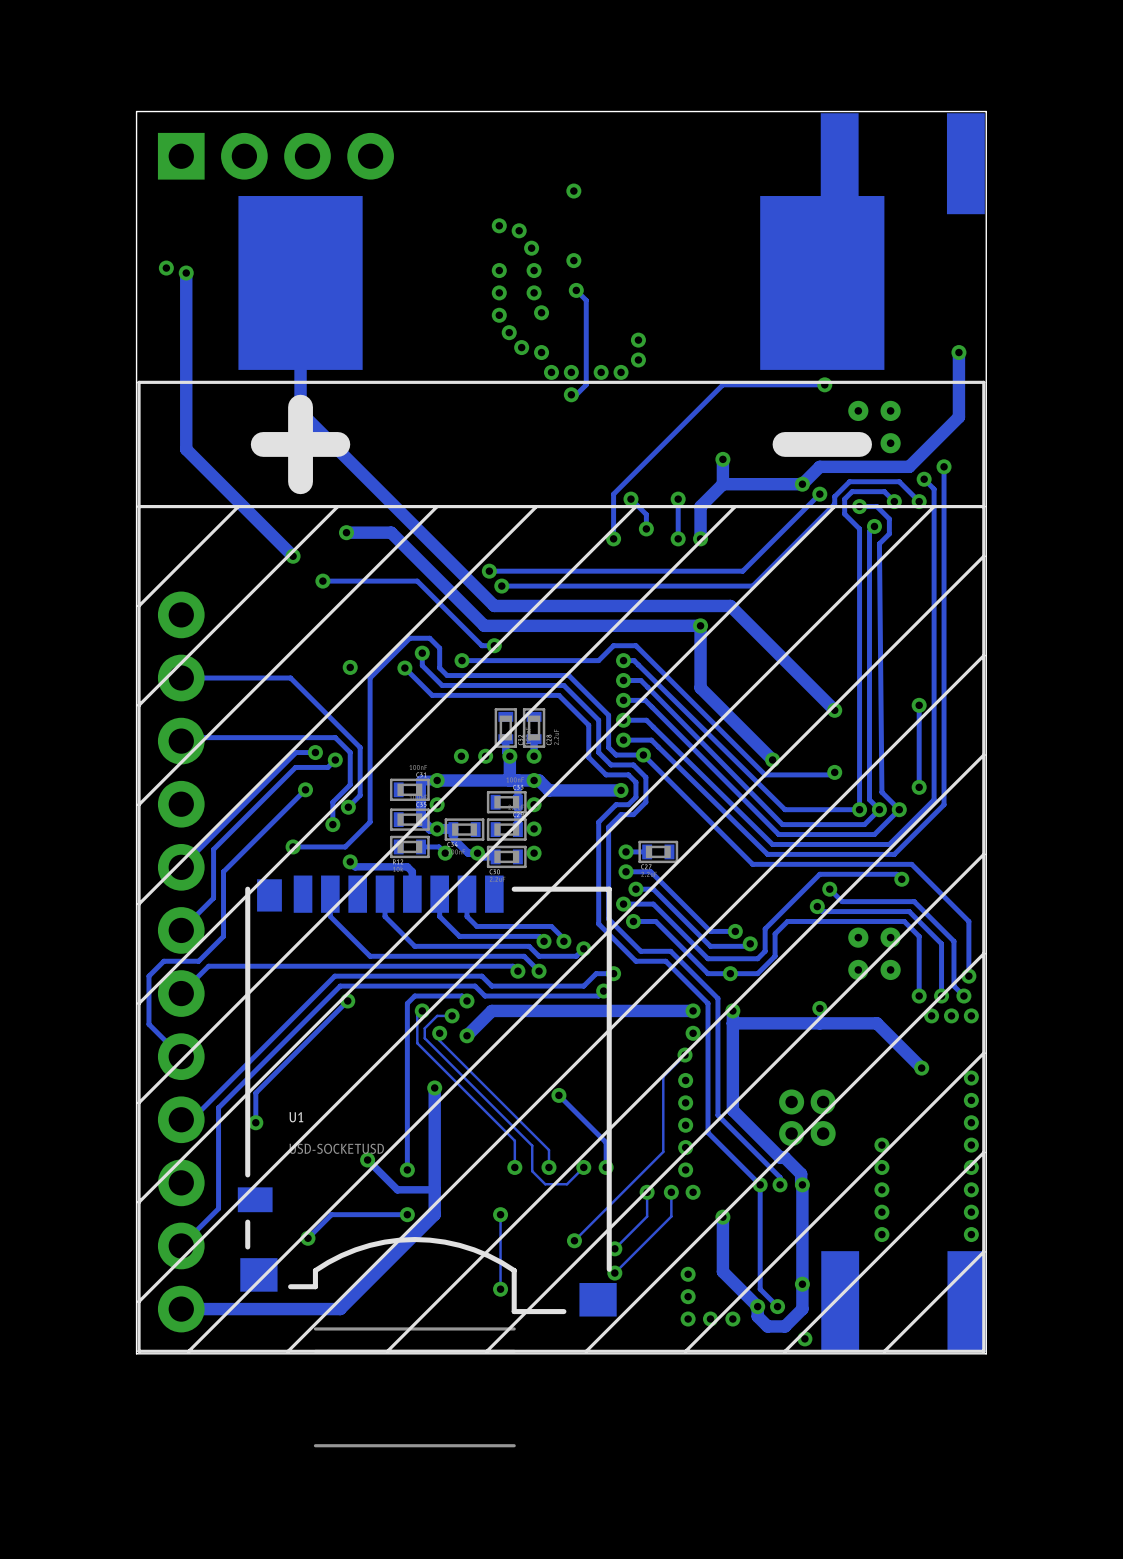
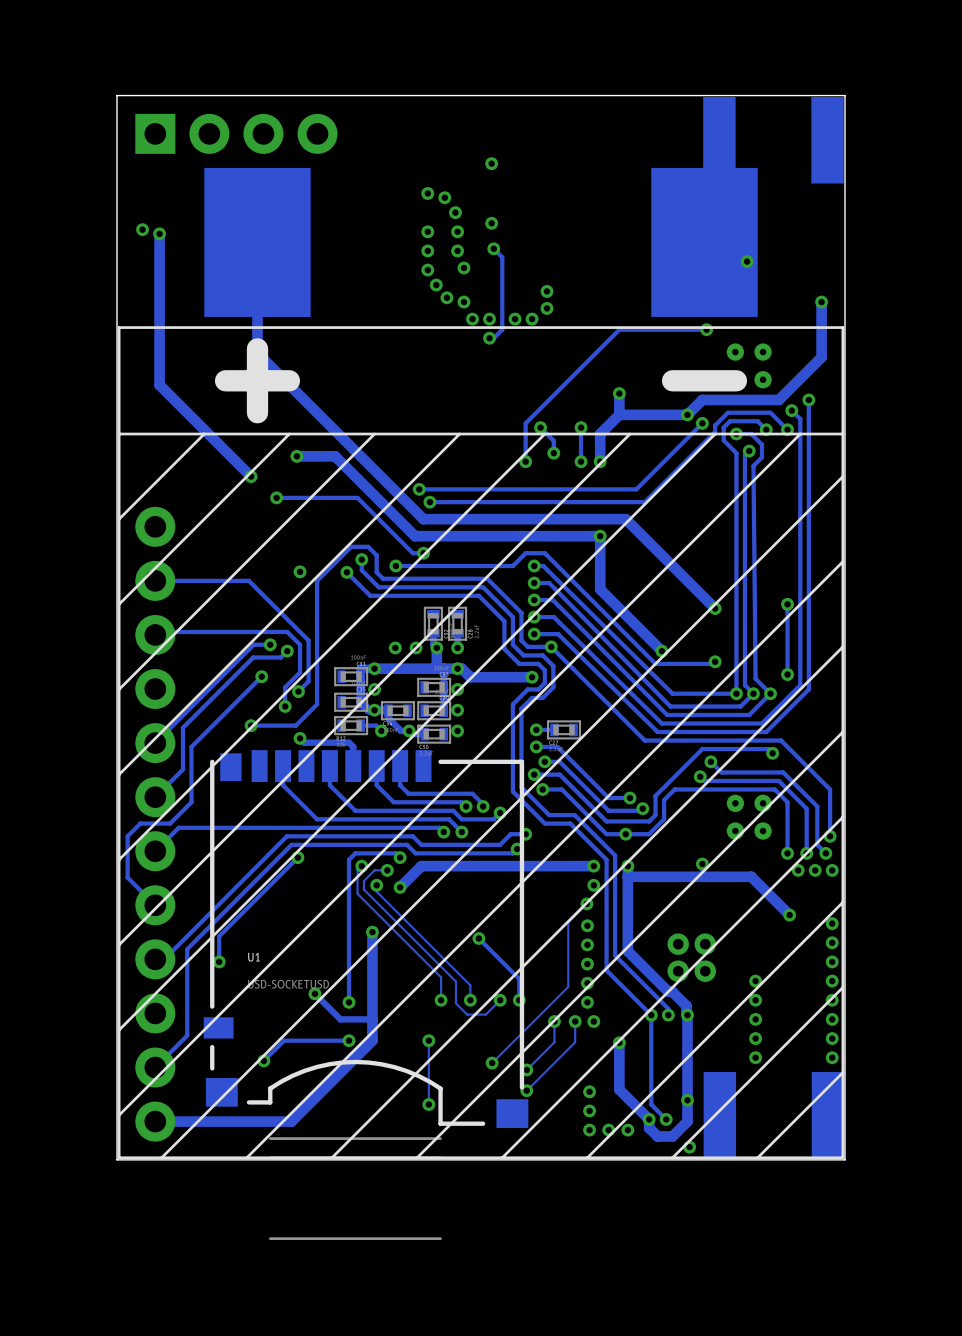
via: none -> (747, 261)

